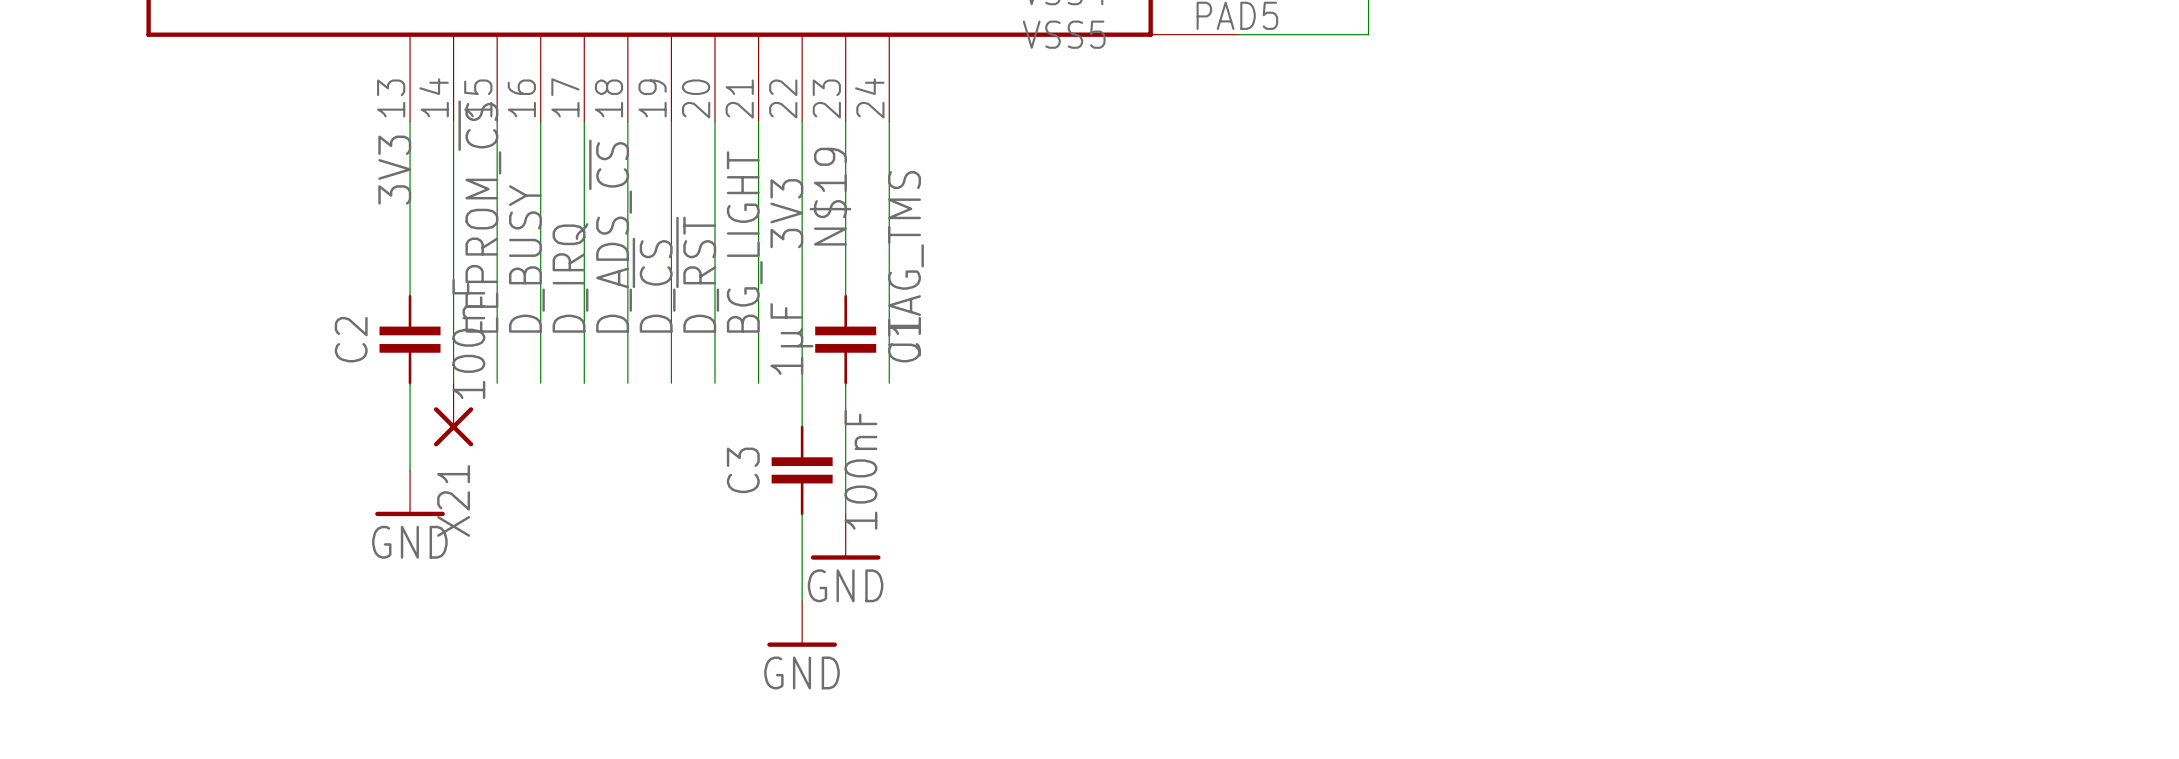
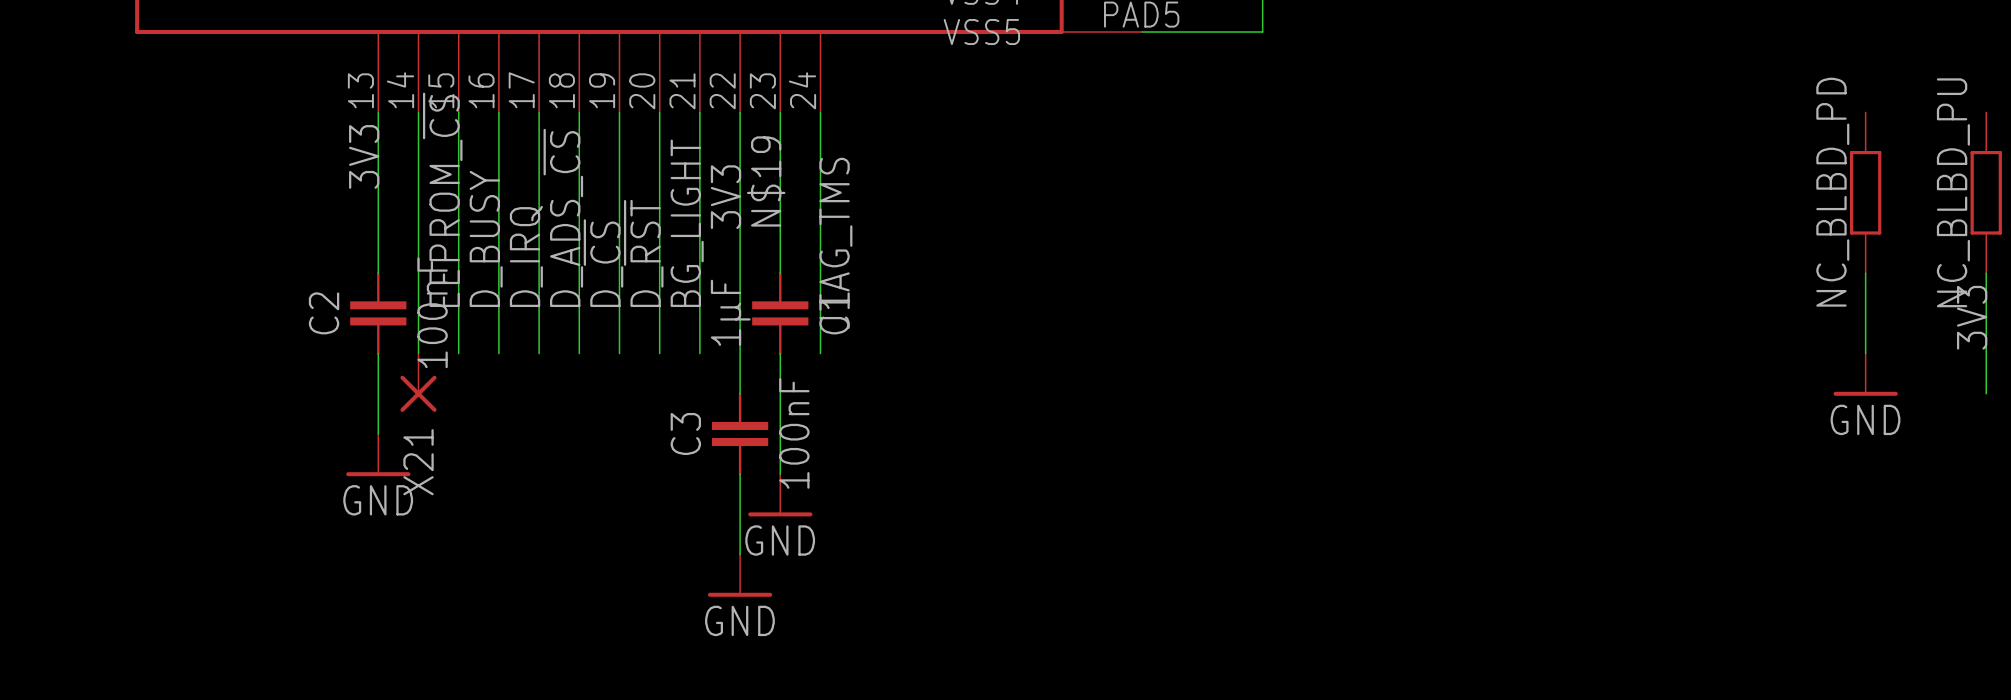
NC_BLBD_PD: none -> (1865, 192)
NC_BLBD_PU: none -> (1986, 192)
wire: none -> (1865, 273) (1865, 353)
wire: none -> (1986, 273) (1986, 393)
label: none -> 3V3 (1972, 317)
power symbol: none -> GND (1865, 374)

